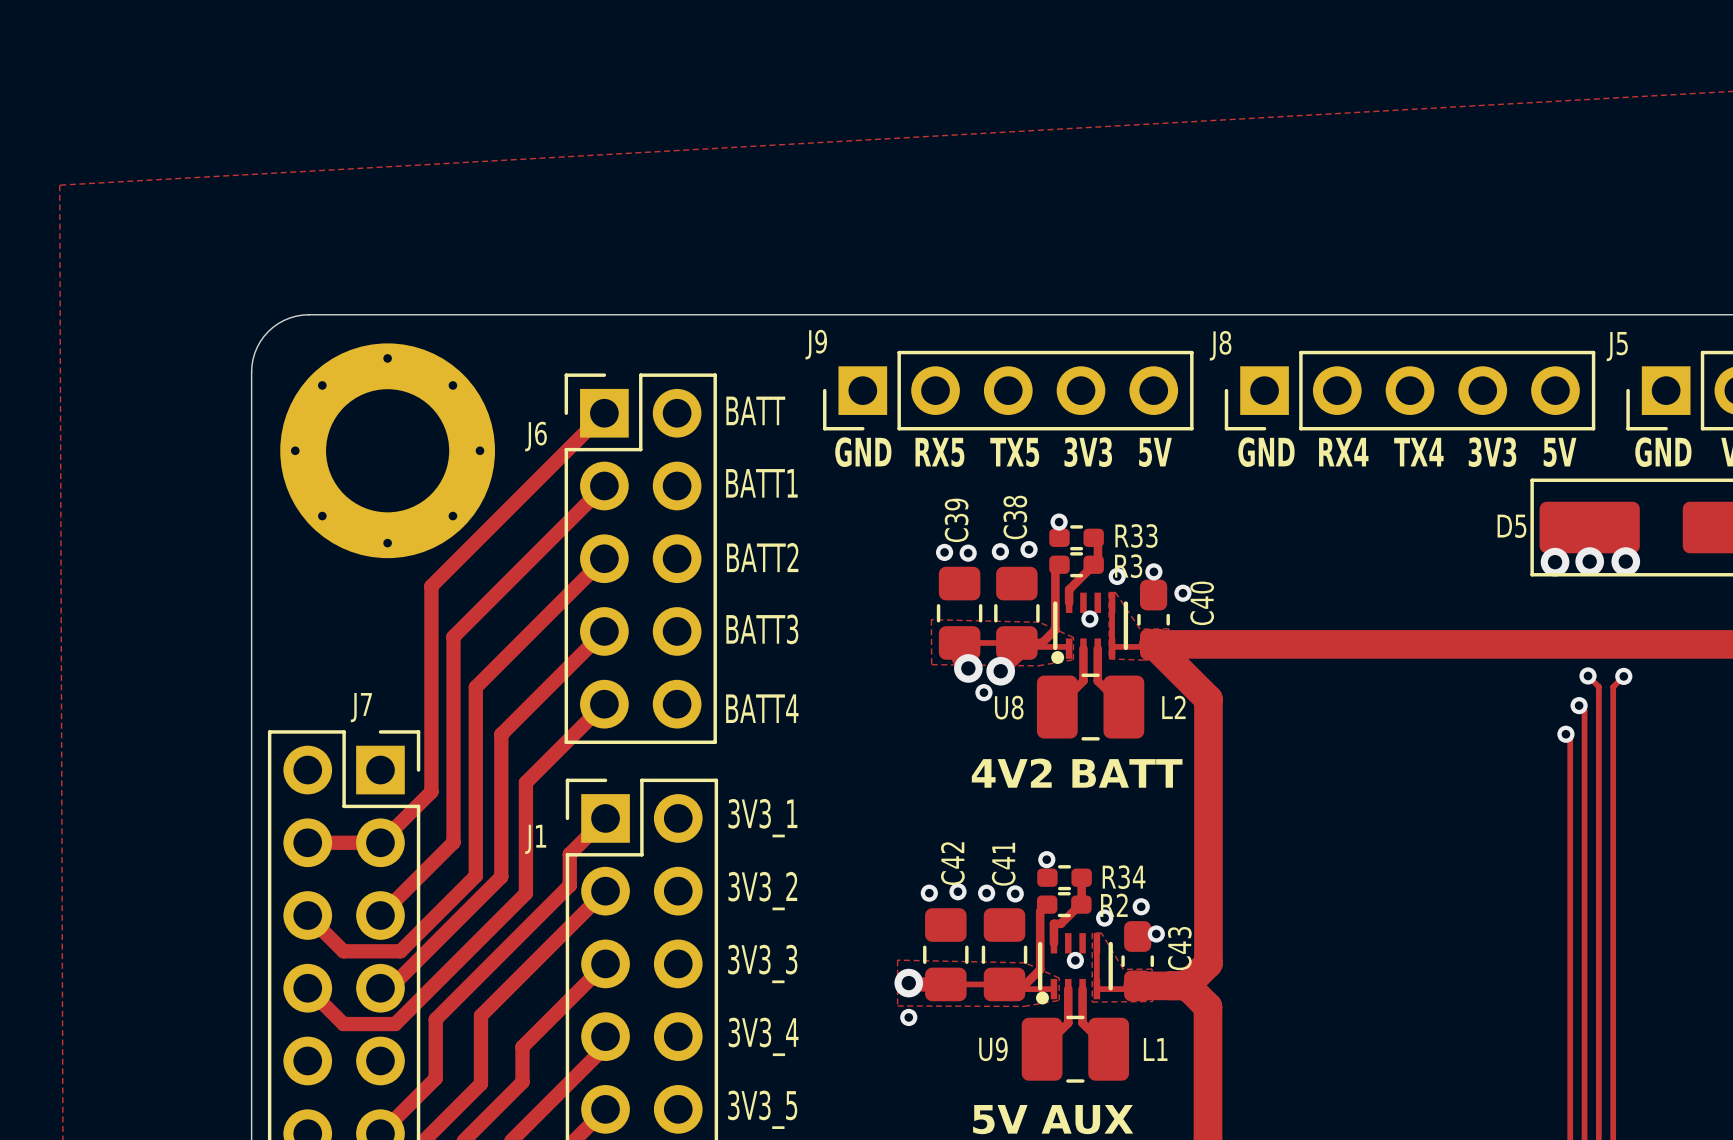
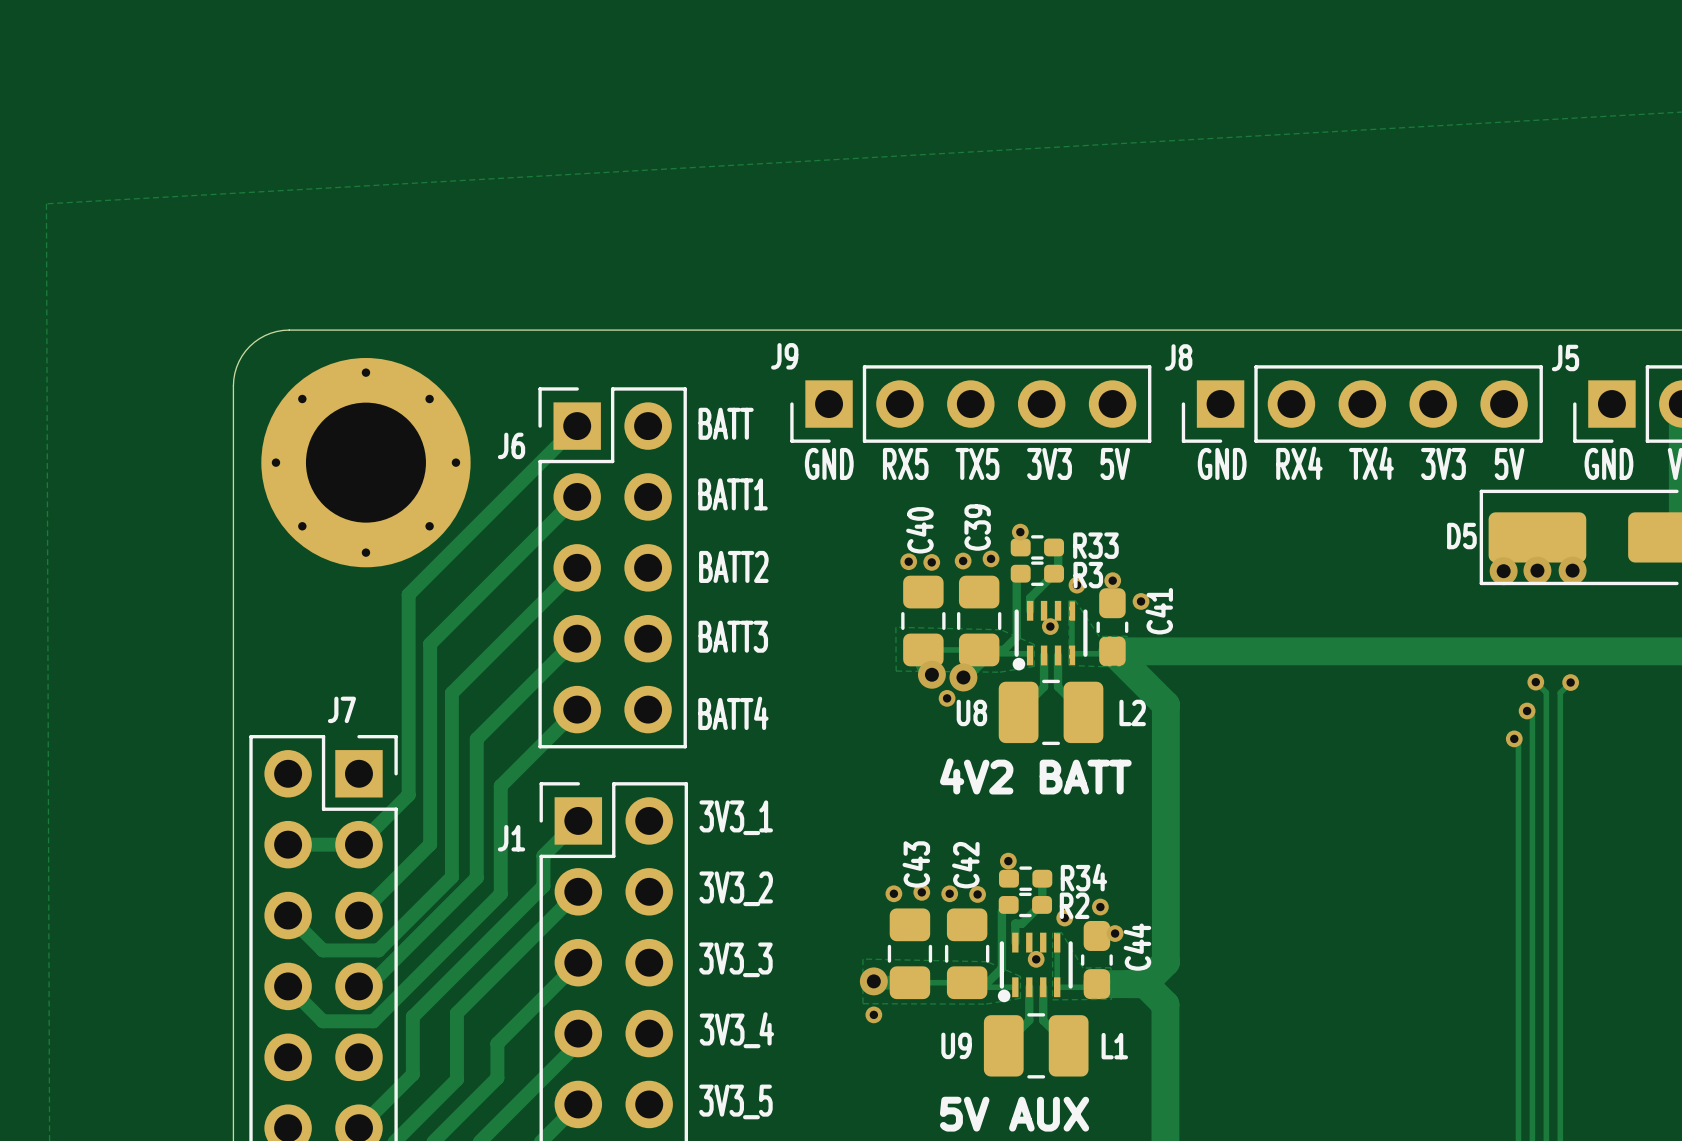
C38 name: C38 (1015, 517) -> C39 (977, 527)
C39 name: C39 (956, 520) -> C40 (919, 530)
C40 name: C40 (1202, 603) -> C41 (1159, 611)
C42 name: C42 (952, 863) -> C43 (916, 864)
C41 name: C41 (1003, 864) -> C42 (965, 865)
C43 name: C43 (1179, 948) -> C44 (1137, 947)

